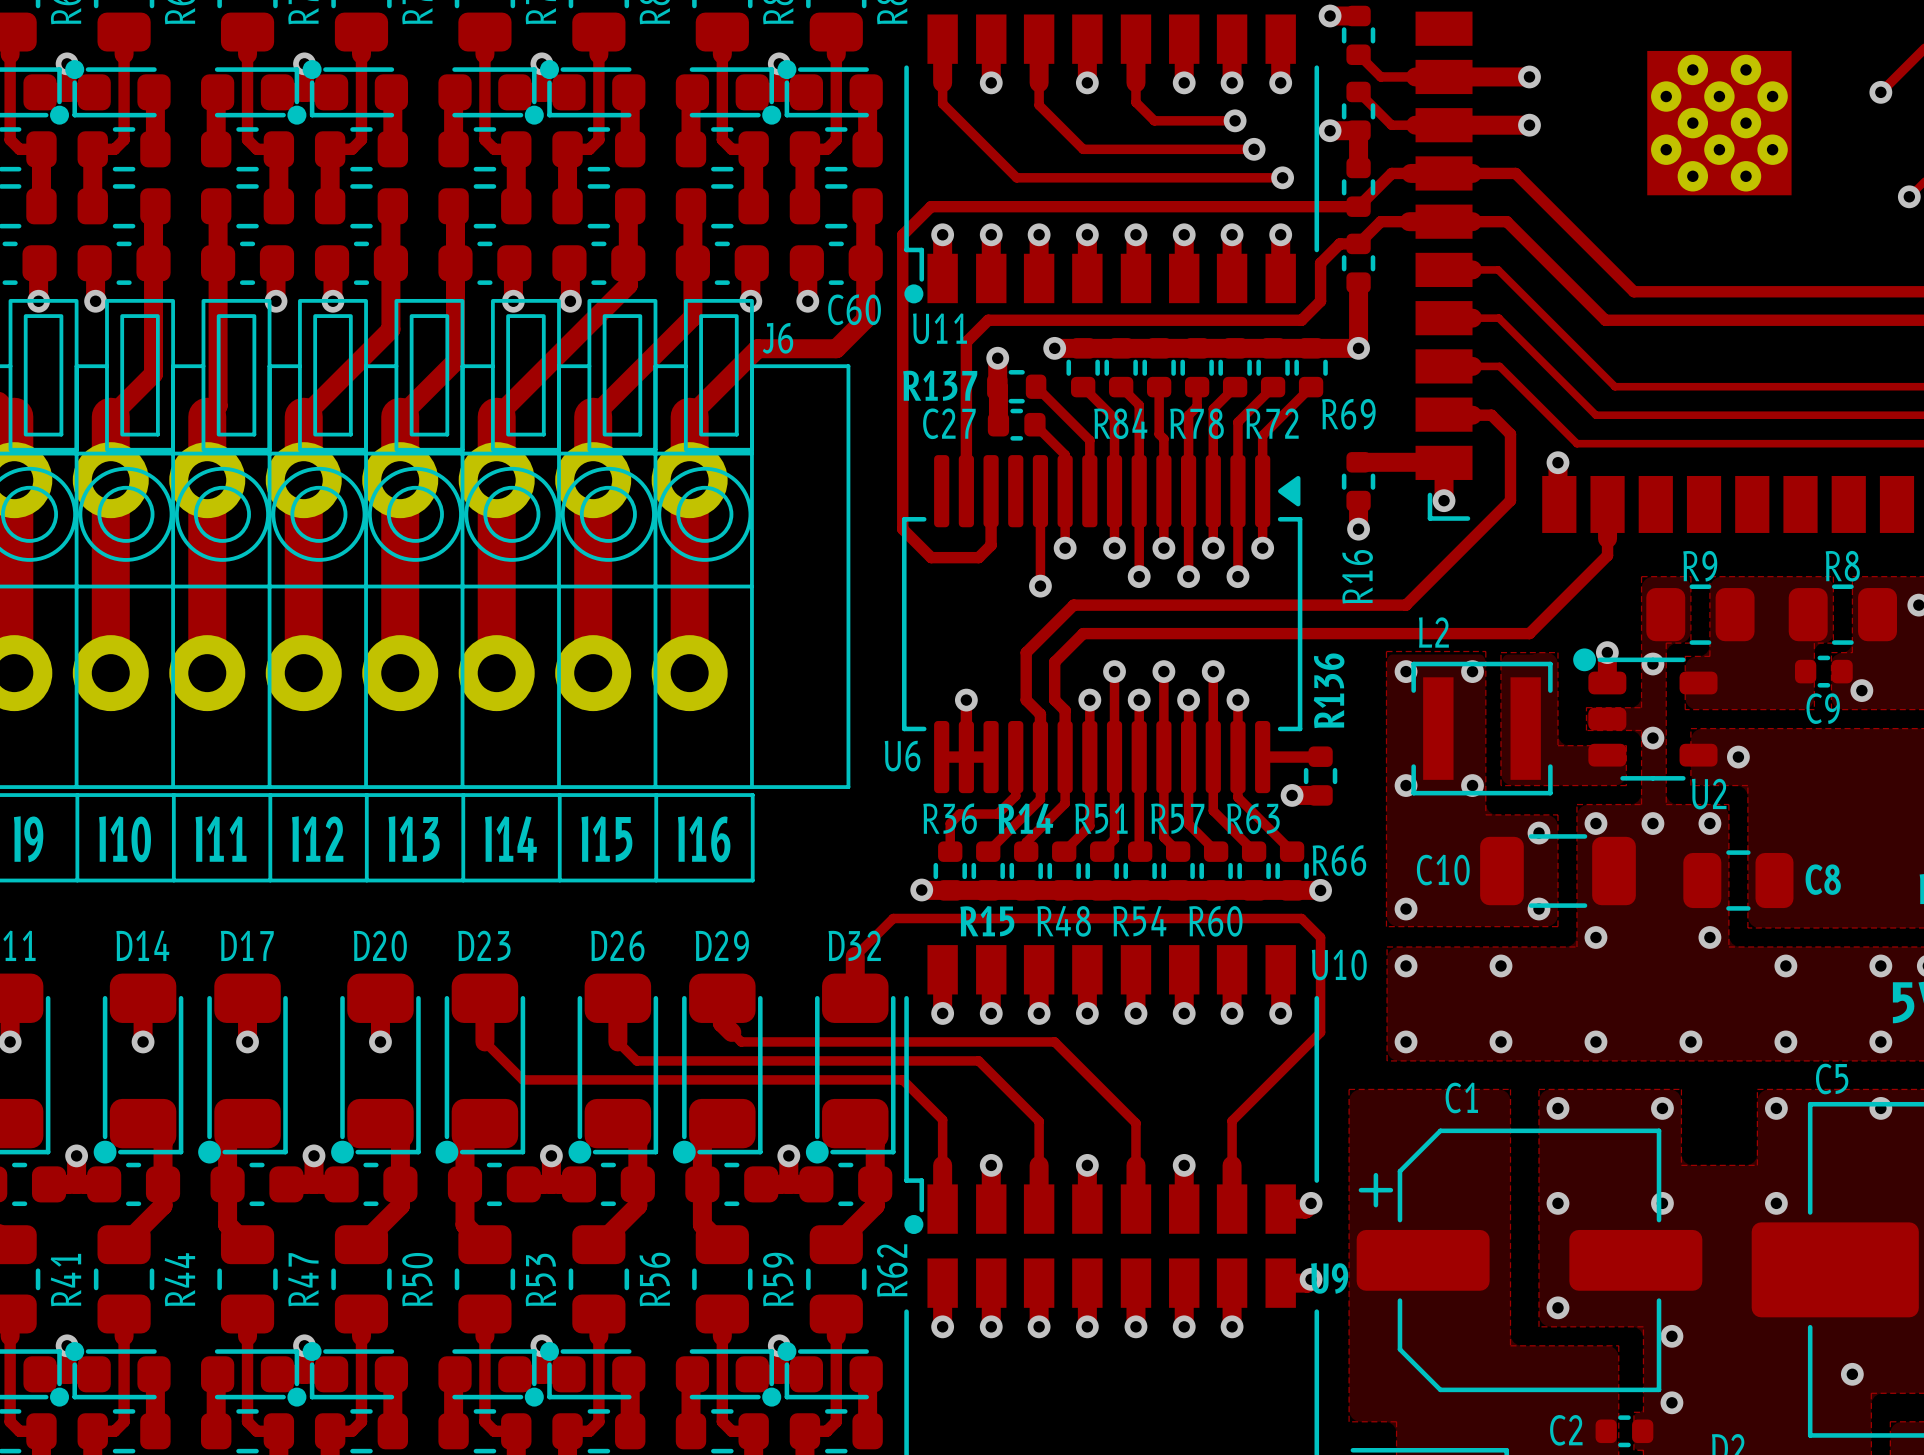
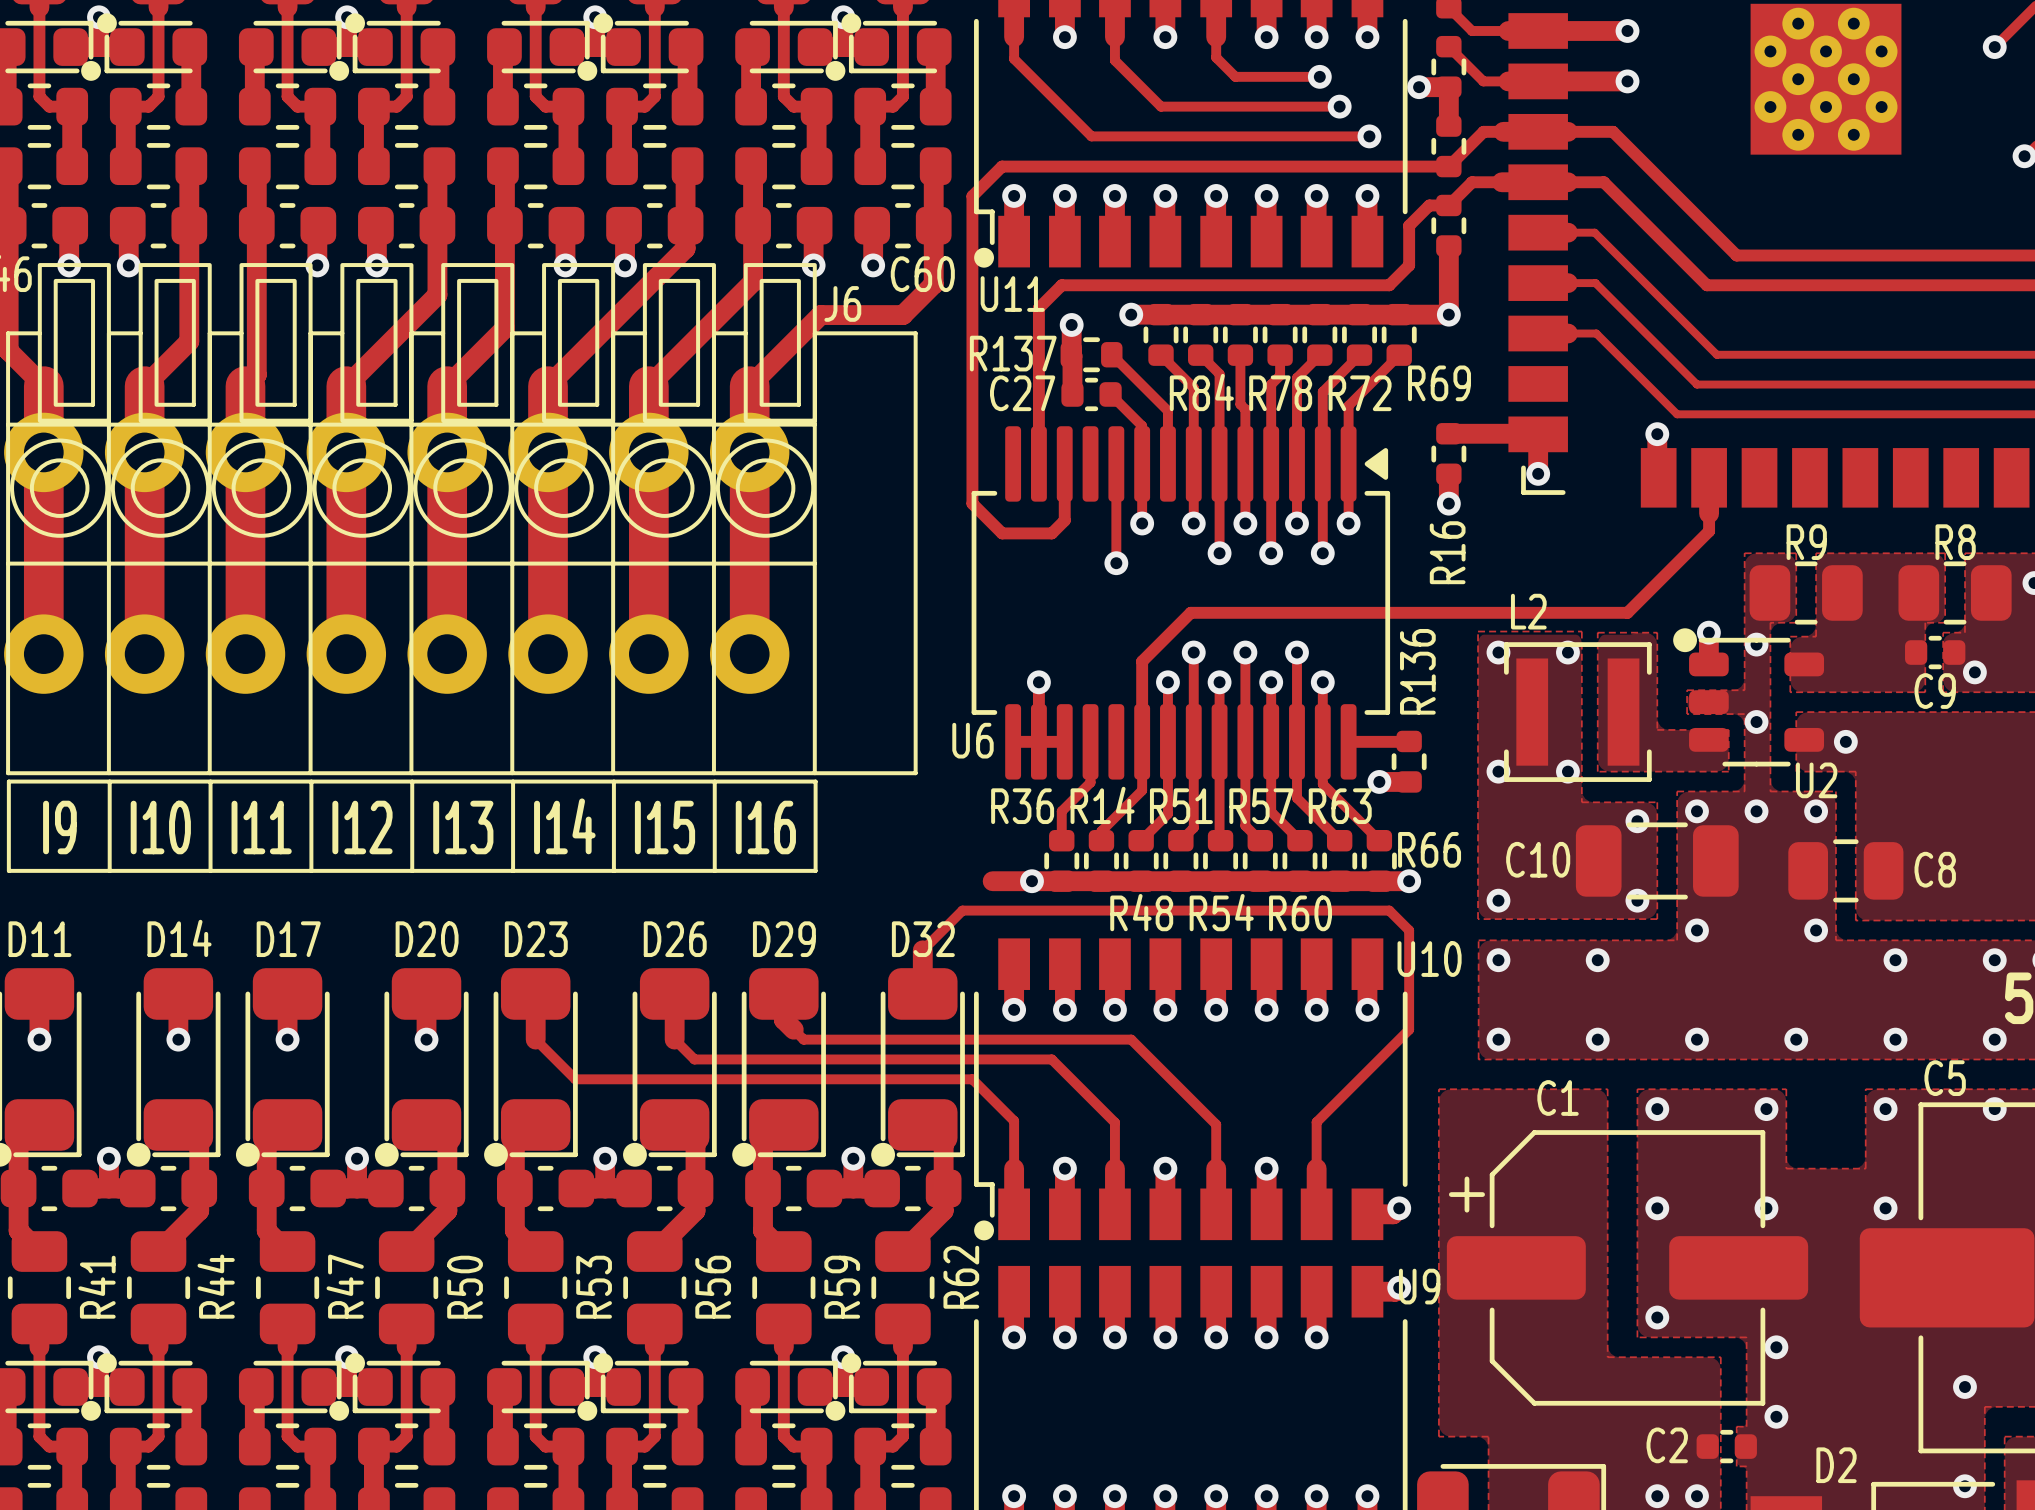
track: (1444, 414) (1491, 415) (1510, 434) (1510, 500) (1406, 605) (1073, 605) (1026, 652) (1026, 700) (1040, 714) (1040, 799) (988, 851) -> none
track: (1111, 633) (1083, 633) (1054, 662) (1054, 700) (1065, 710) -> (1190, 612) (1142, 661) (1142, 693)
track: (997, 814) (959, 814) (950, 823) (950, 851) -> (1071, 801) (1061, 811) (1061, 840)
R36: (950, 871) -> none
via position: (921, 890) -> (1031, 881)
R15 name: R15 (987, 921) -> R36 (1022, 806)

